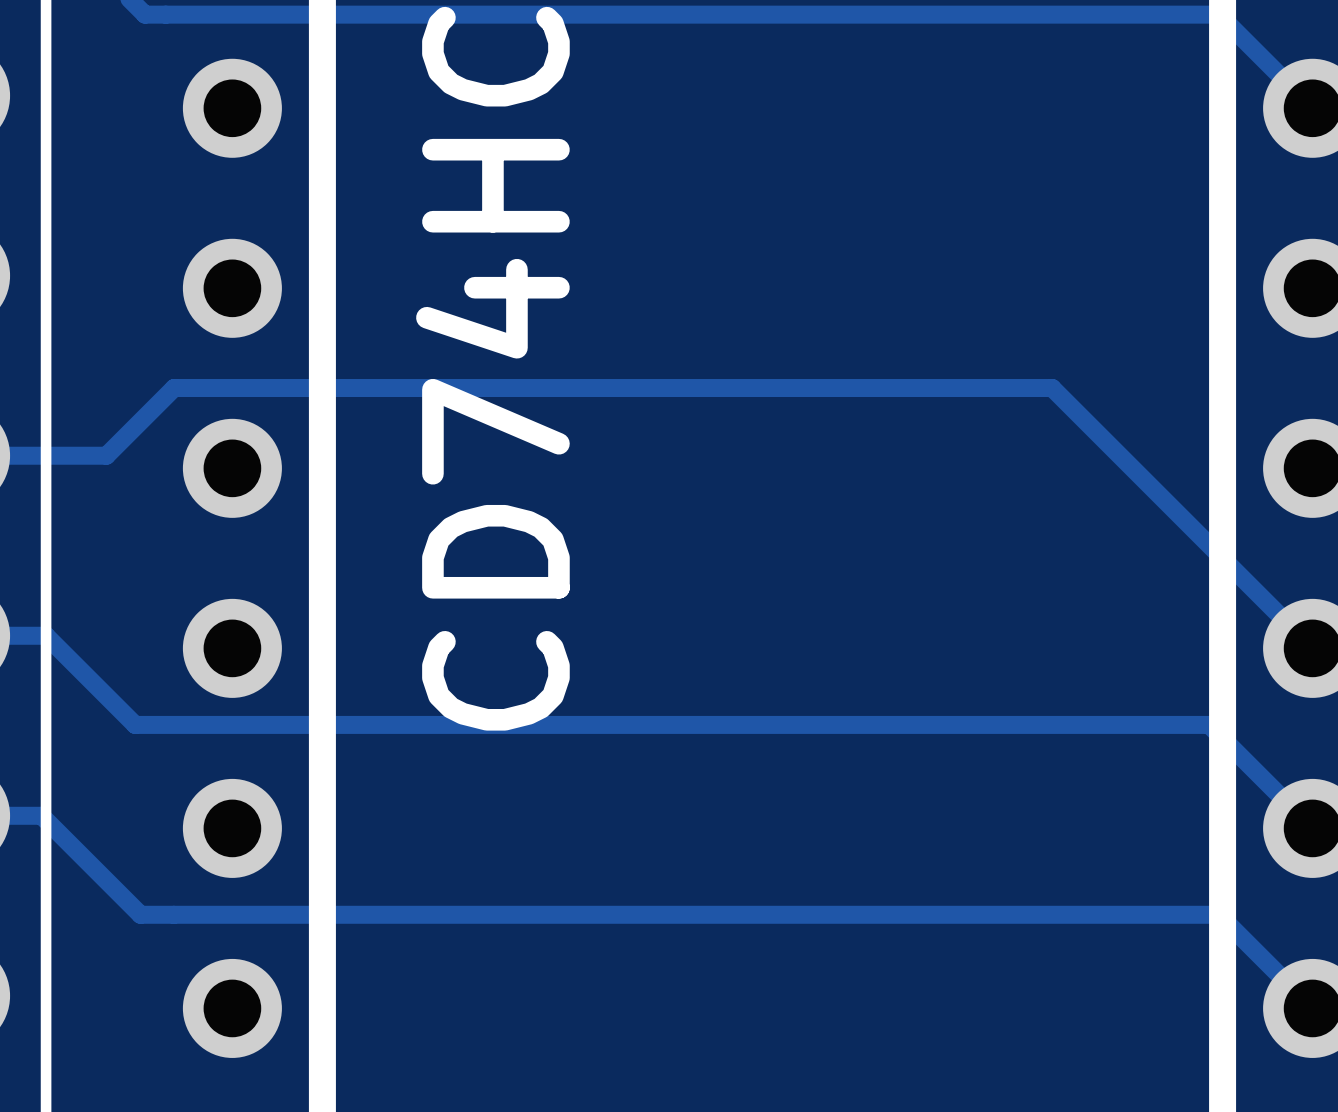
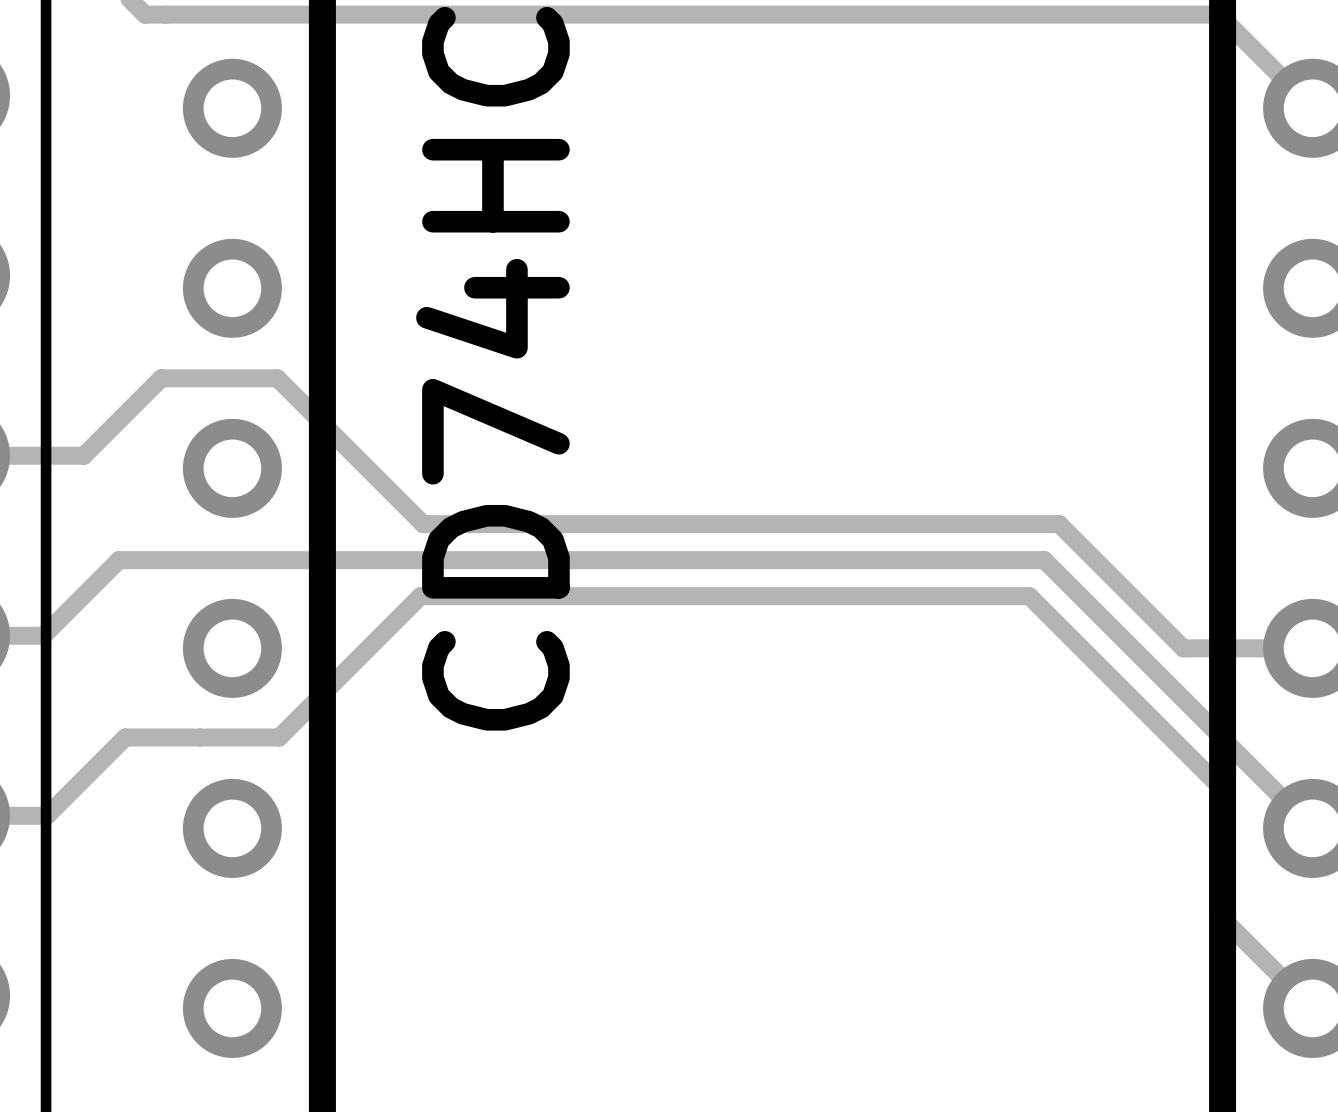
track: (83, 455) (106, 455) (174, 388) (1052, 388) (1312, 648) -> (83, 455) (161, 378) (277, 378) (423, 524) (1059, 524) (1183, 648) (1312, 648)
track: (43, 635) (46, 635) (135, 724) (1209, 724) -> (43, 635) (119, 560) (1044, 560) (1209, 724)
track: (41, 815) (140, 914) (1218, 914) -> (41, 815) (47, 815) (125, 737) (279, 737) (420, 596) (1029, 596) (1218, 784) (1218, 913)

